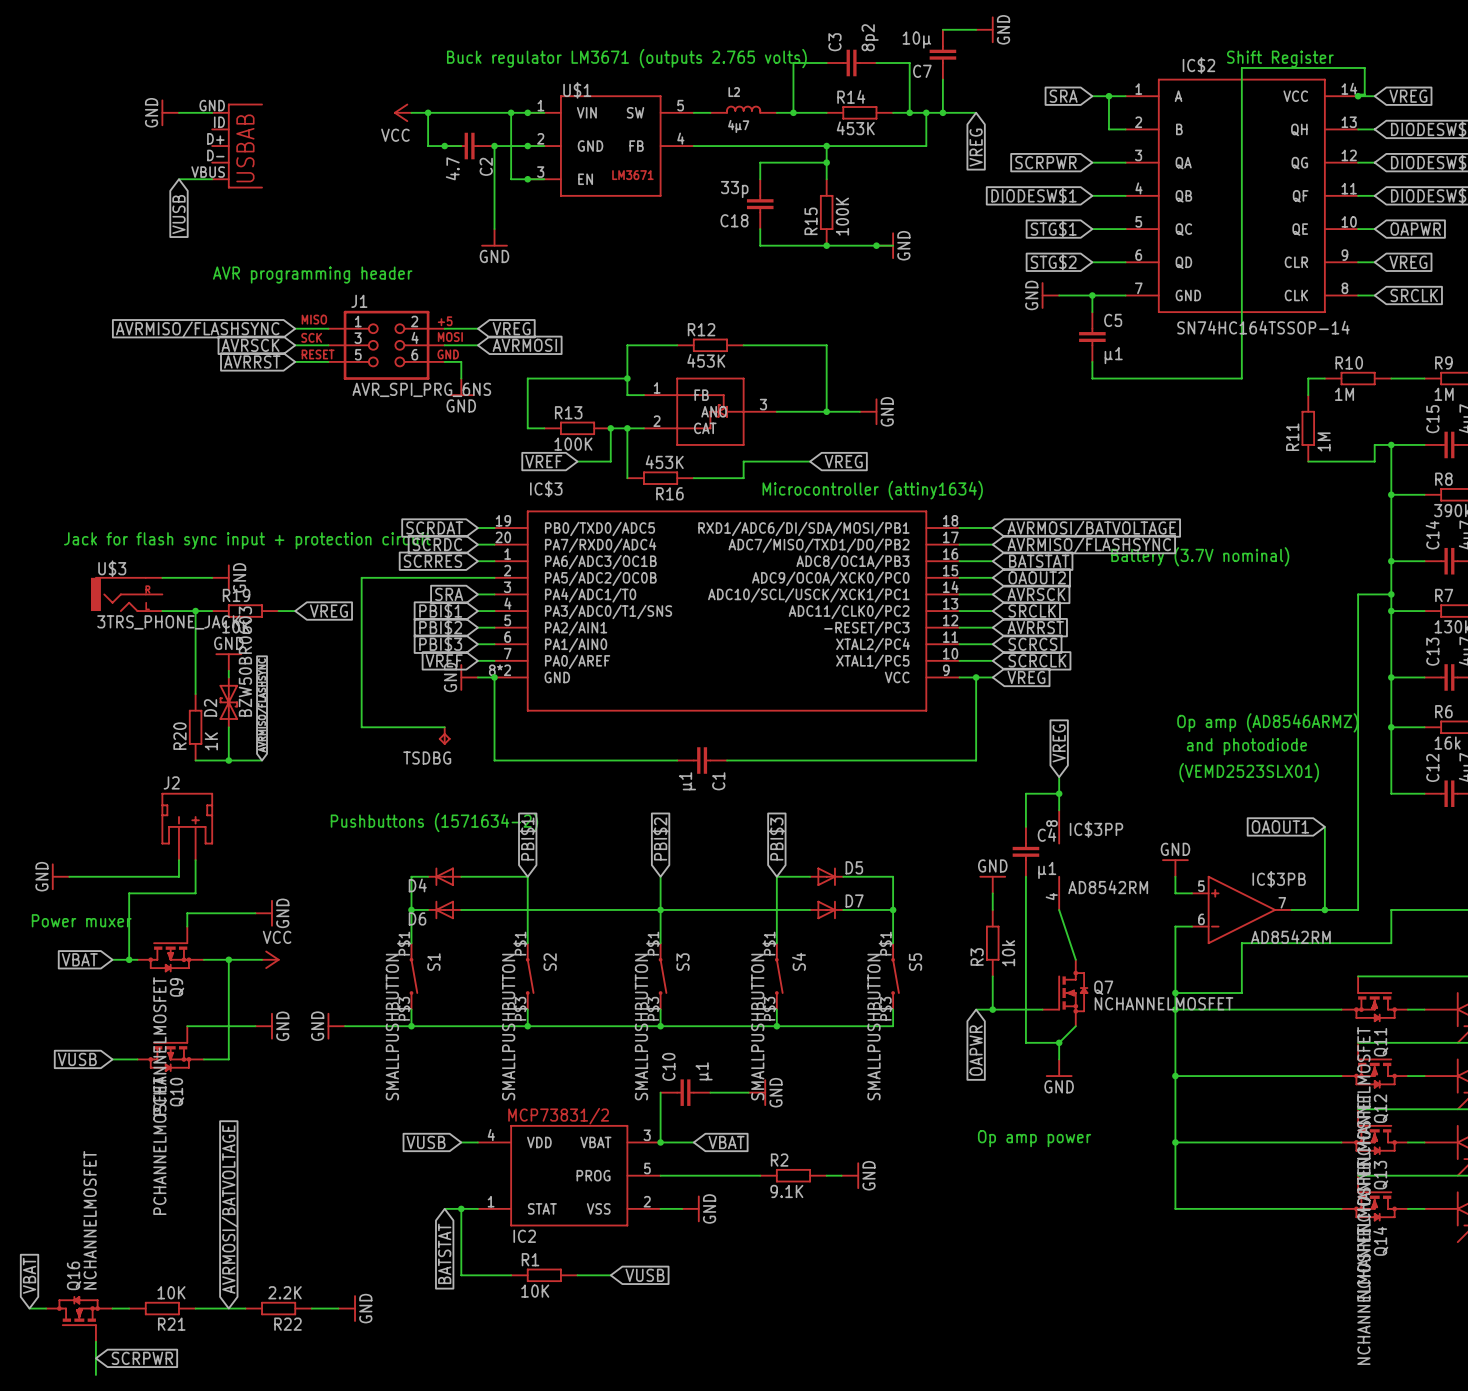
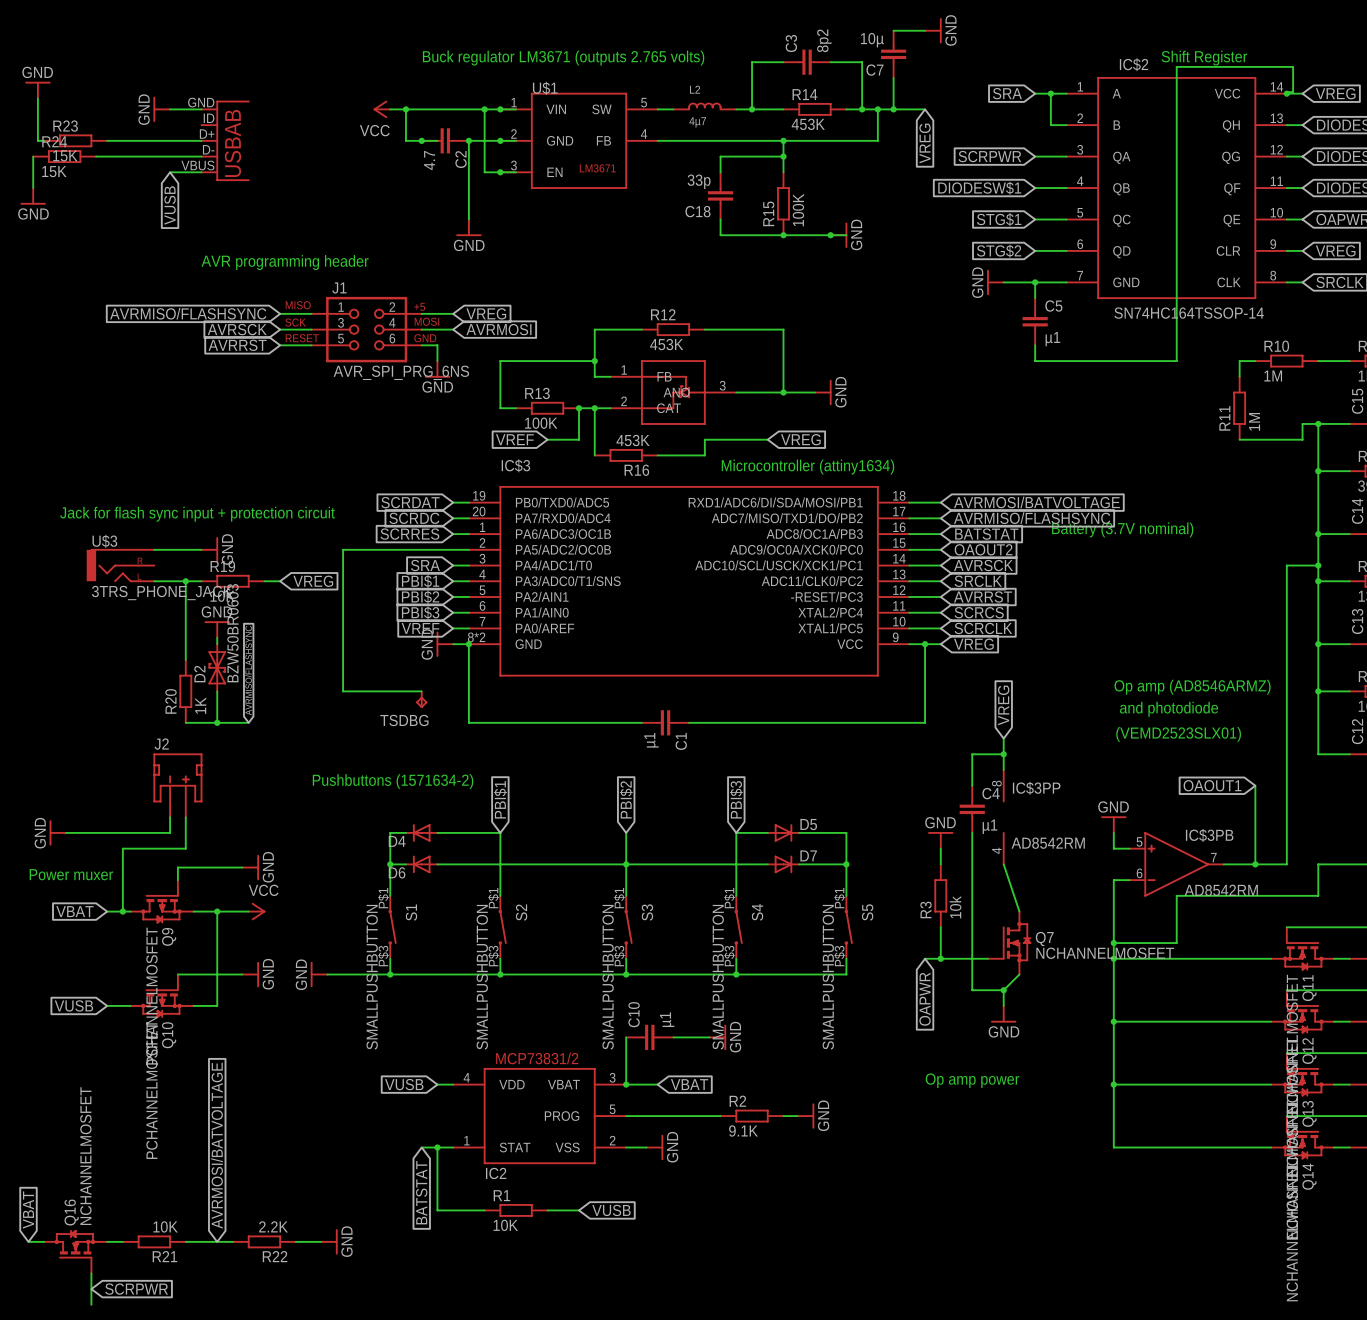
power symbol: none -> GND (37, 90)
wire: none -> (37, 98) (37, 140) (44, 140)
R23: none -> 15K (75, 140)
wire: none -> (107, 140) (201, 140)
wire: none -> (33, 156) (33, 188)
R24: none -> 15K (64, 156)
wire: none -> (96, 156) (201, 156)
power symbol: none -> GND (33, 196)

